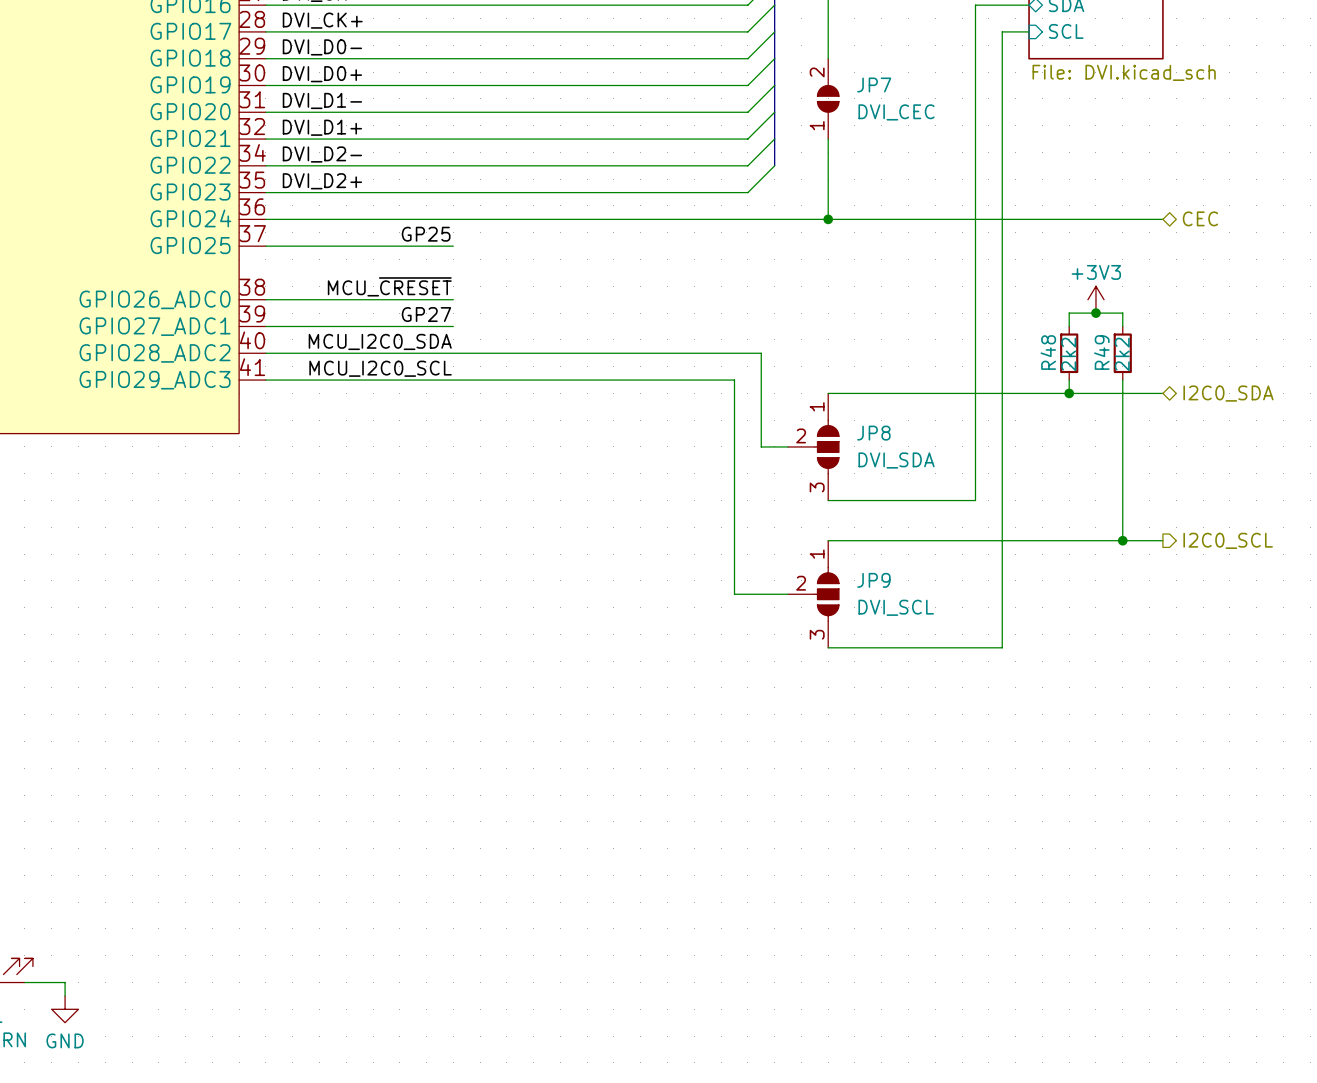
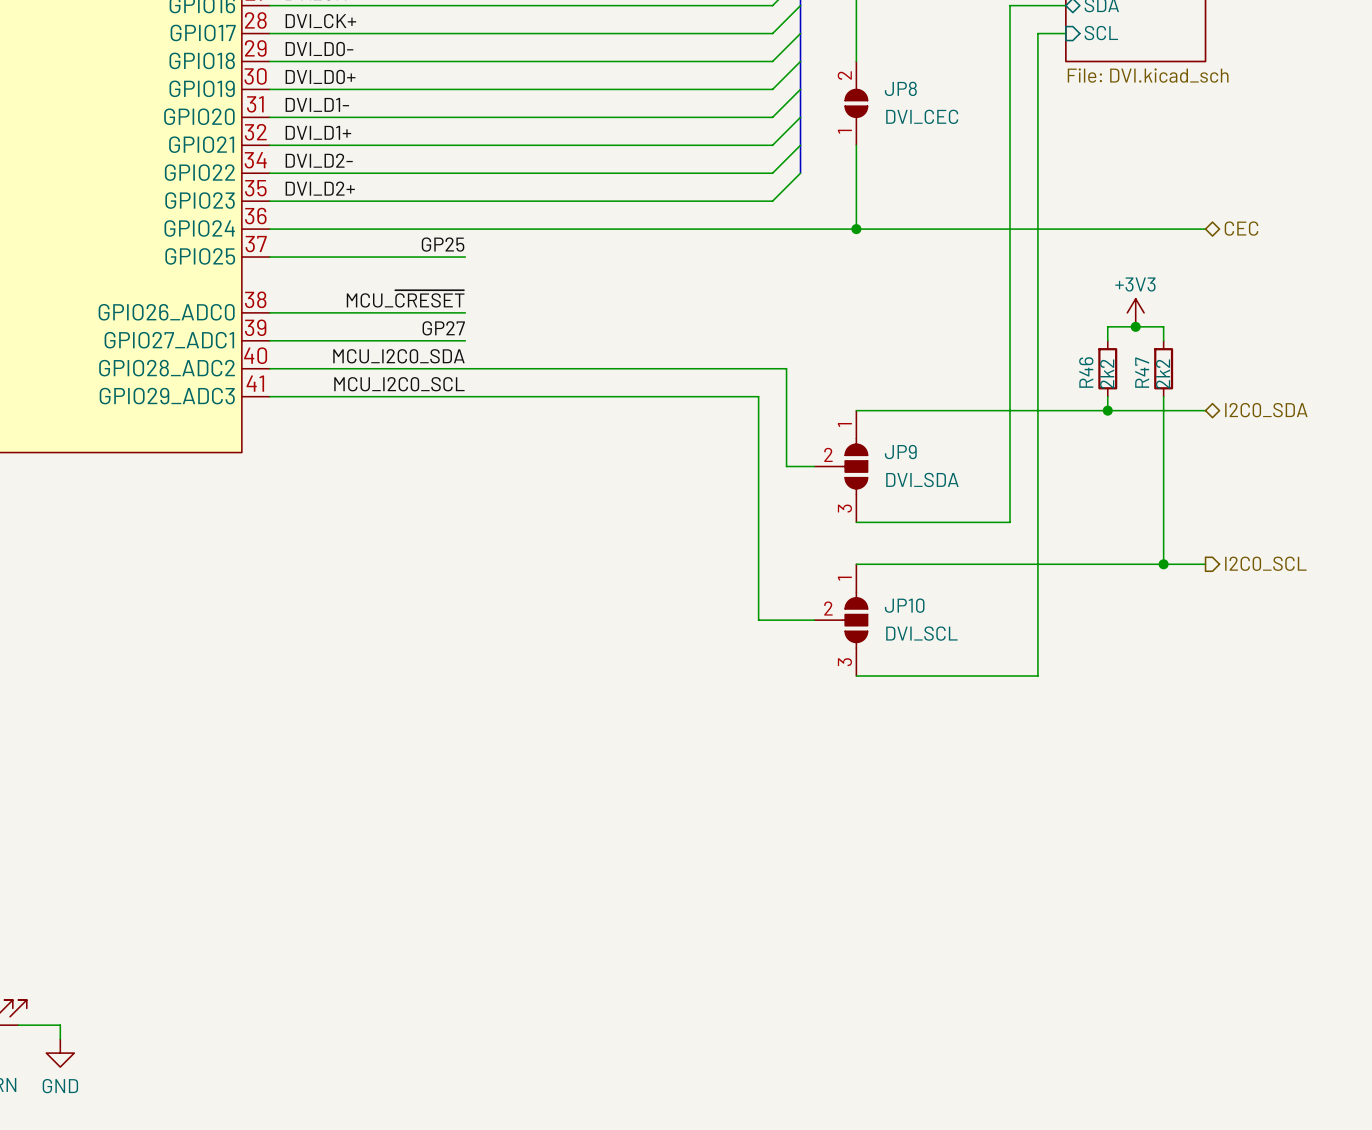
JP7 name: JP7 (874, 84) -> JP8 (900, 88)
R48 name: R48 (1048, 352) -> R46 (1086, 372)
R49 name: R49 (1101, 352) -> R47 (1142, 372)
JP8 name: JP8 (873, 433) -> JP9 (900, 452)
JP9 name: JP9 (873, 580) -> JP10 (904, 605)

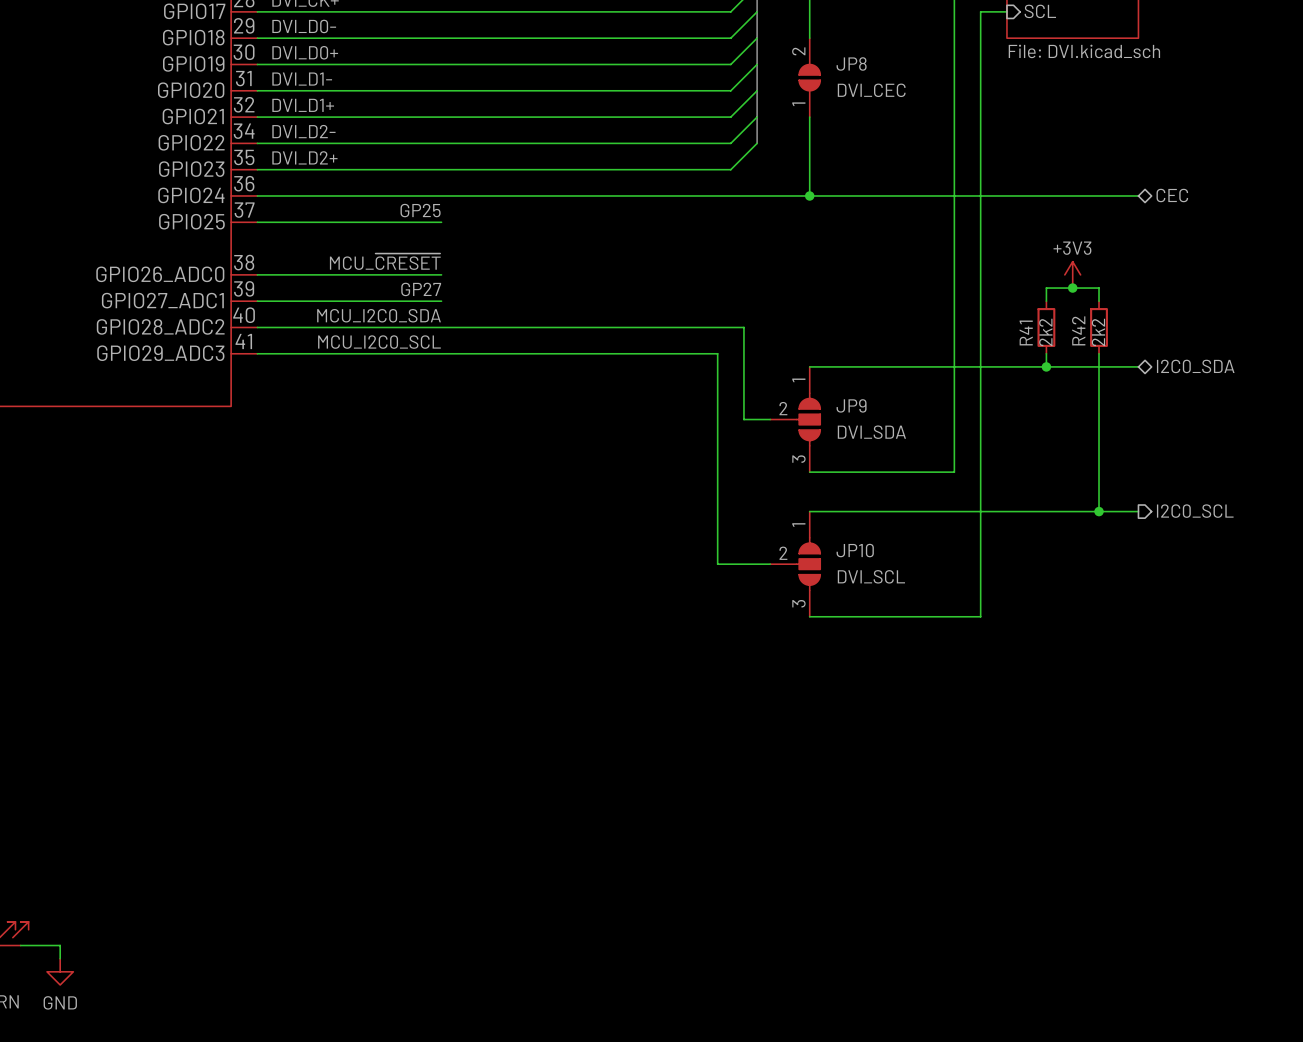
R46 name: R46 (1086, 372) -> R41 (1026, 332)
R47 name: R47 (1142, 372) -> R42 (1078, 330)

